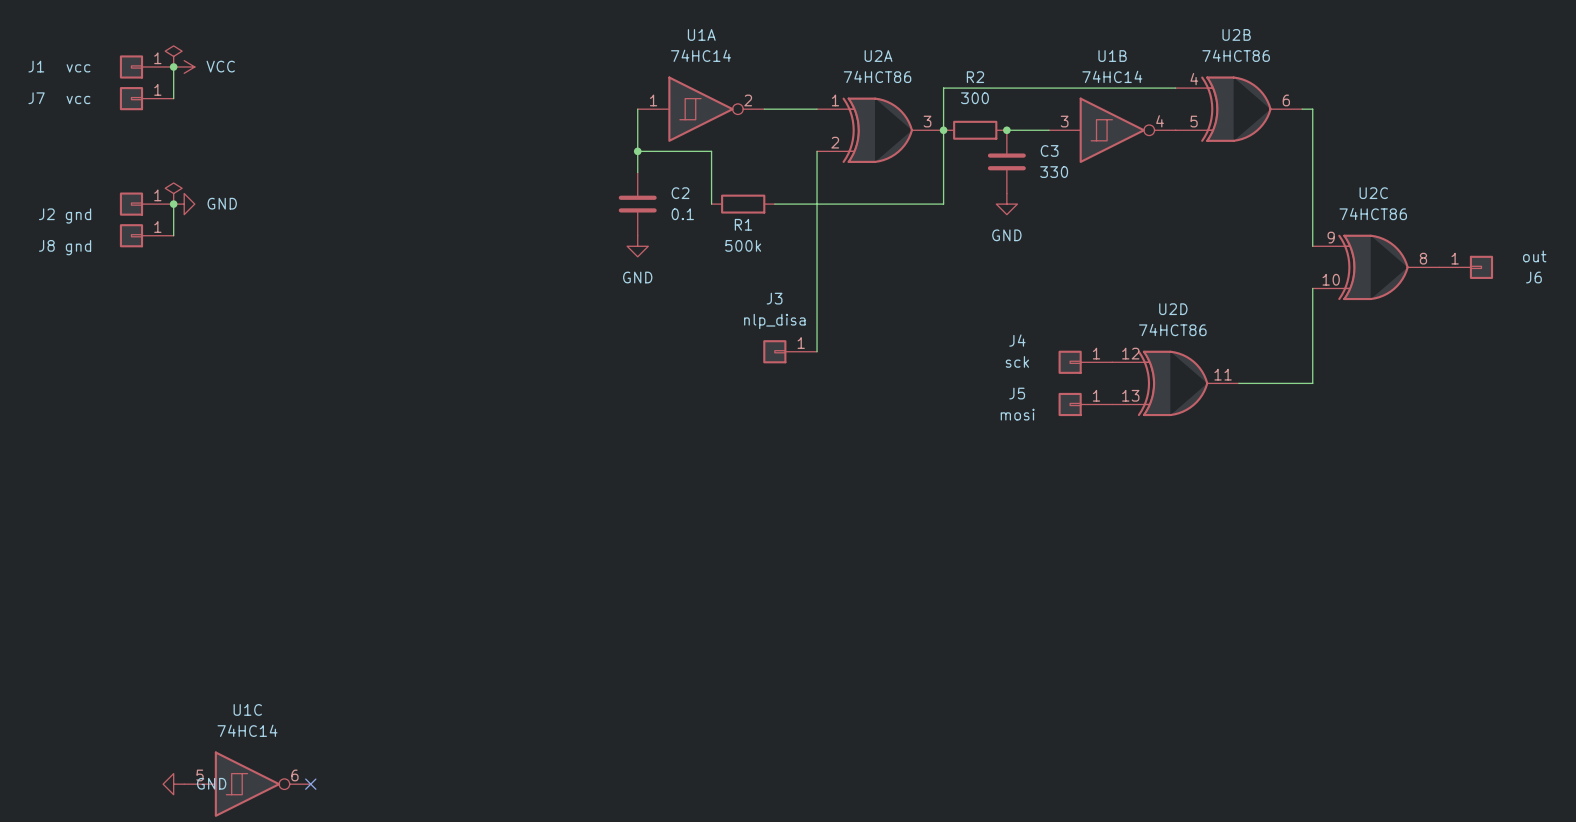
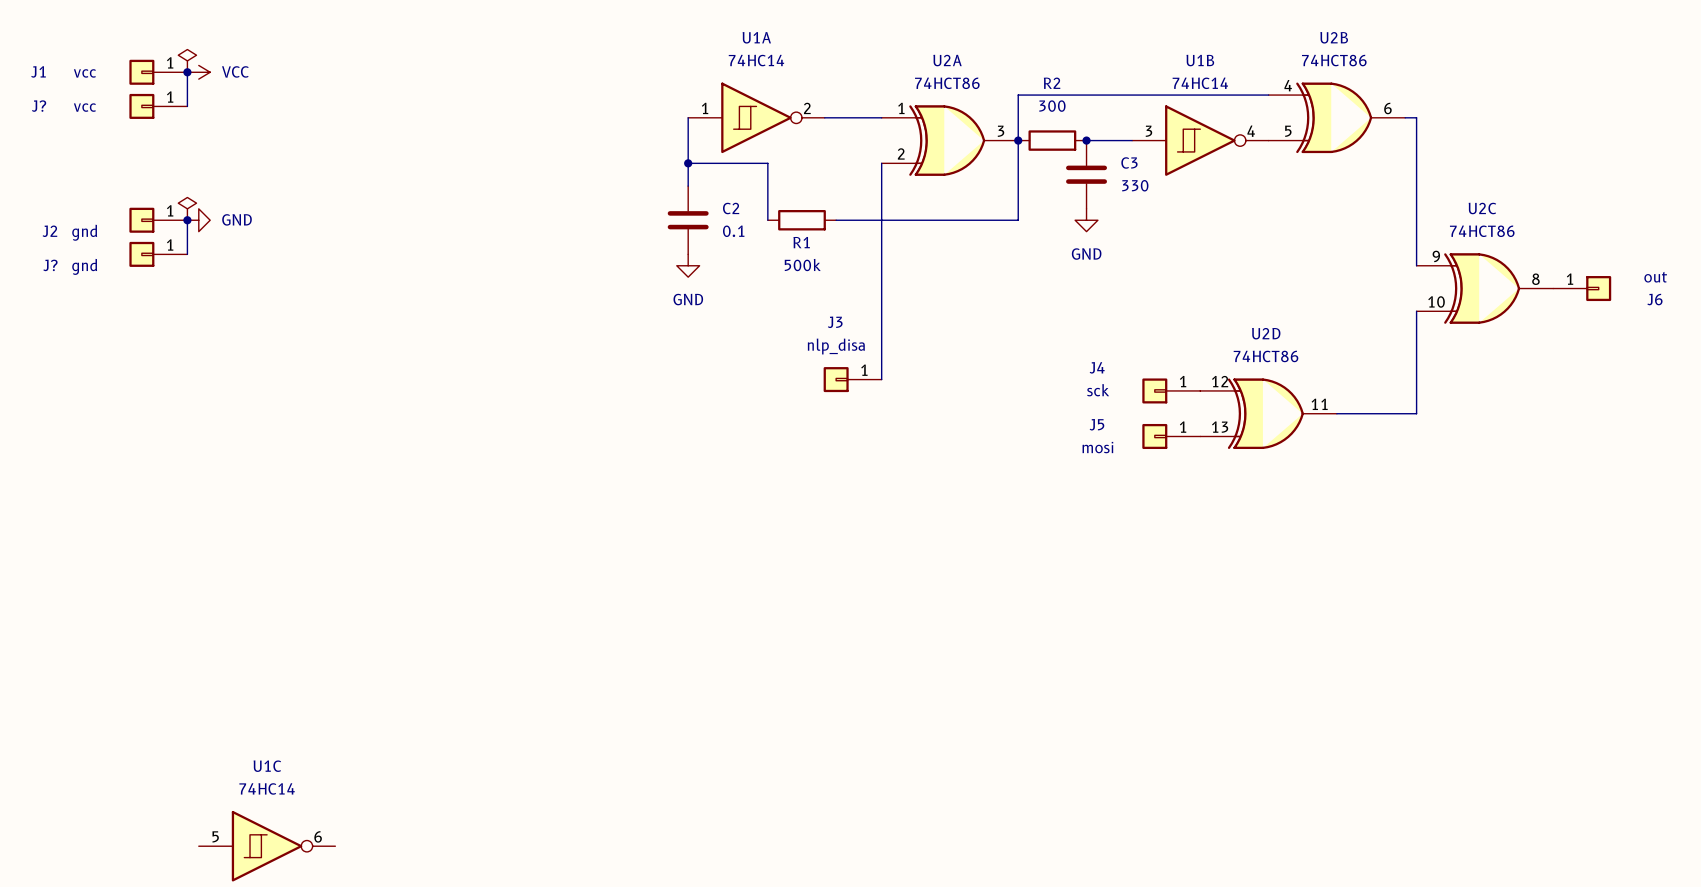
J7 name: J7 (36, 98) -> J? (39, 106)
J8 name: J8 (46, 245) -> J? (50, 265)
power symbol: GND (173, 784) -> none
no-connect mark: (310, 784) -> none

